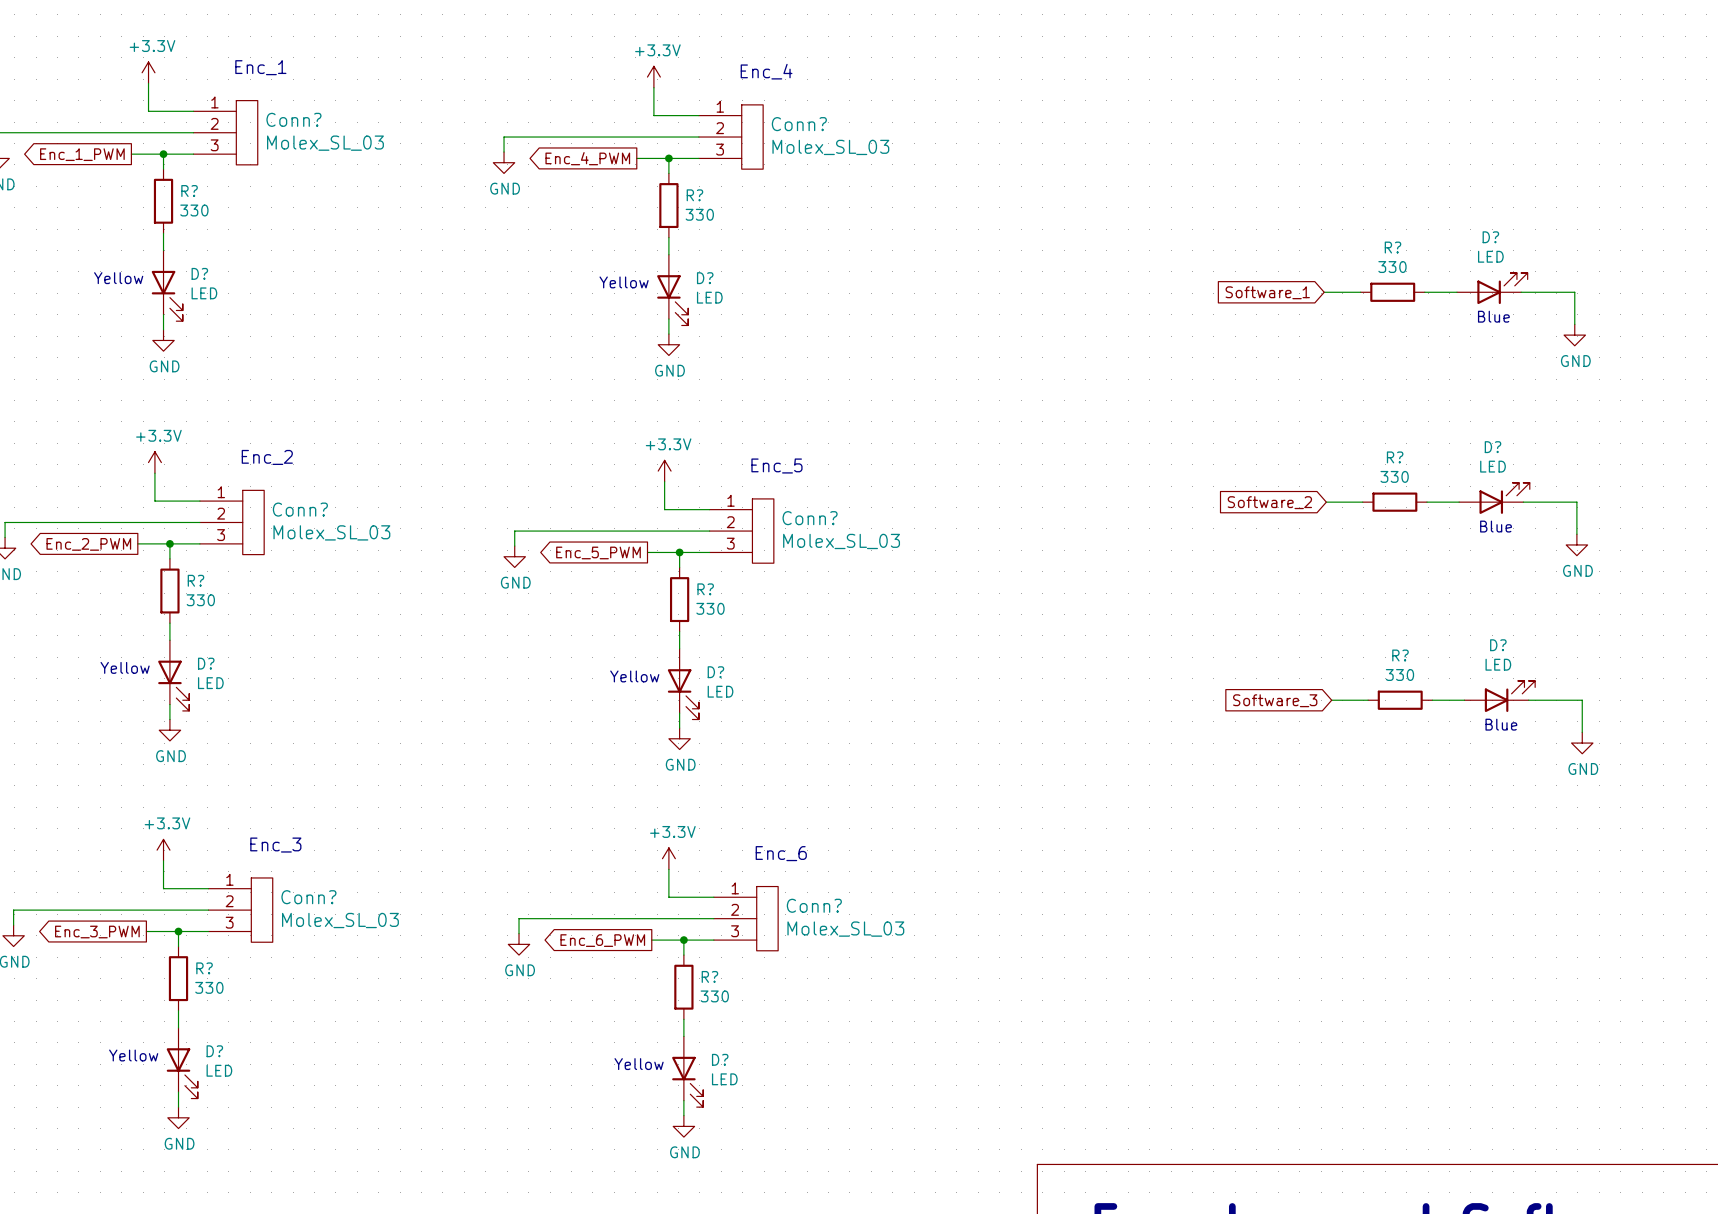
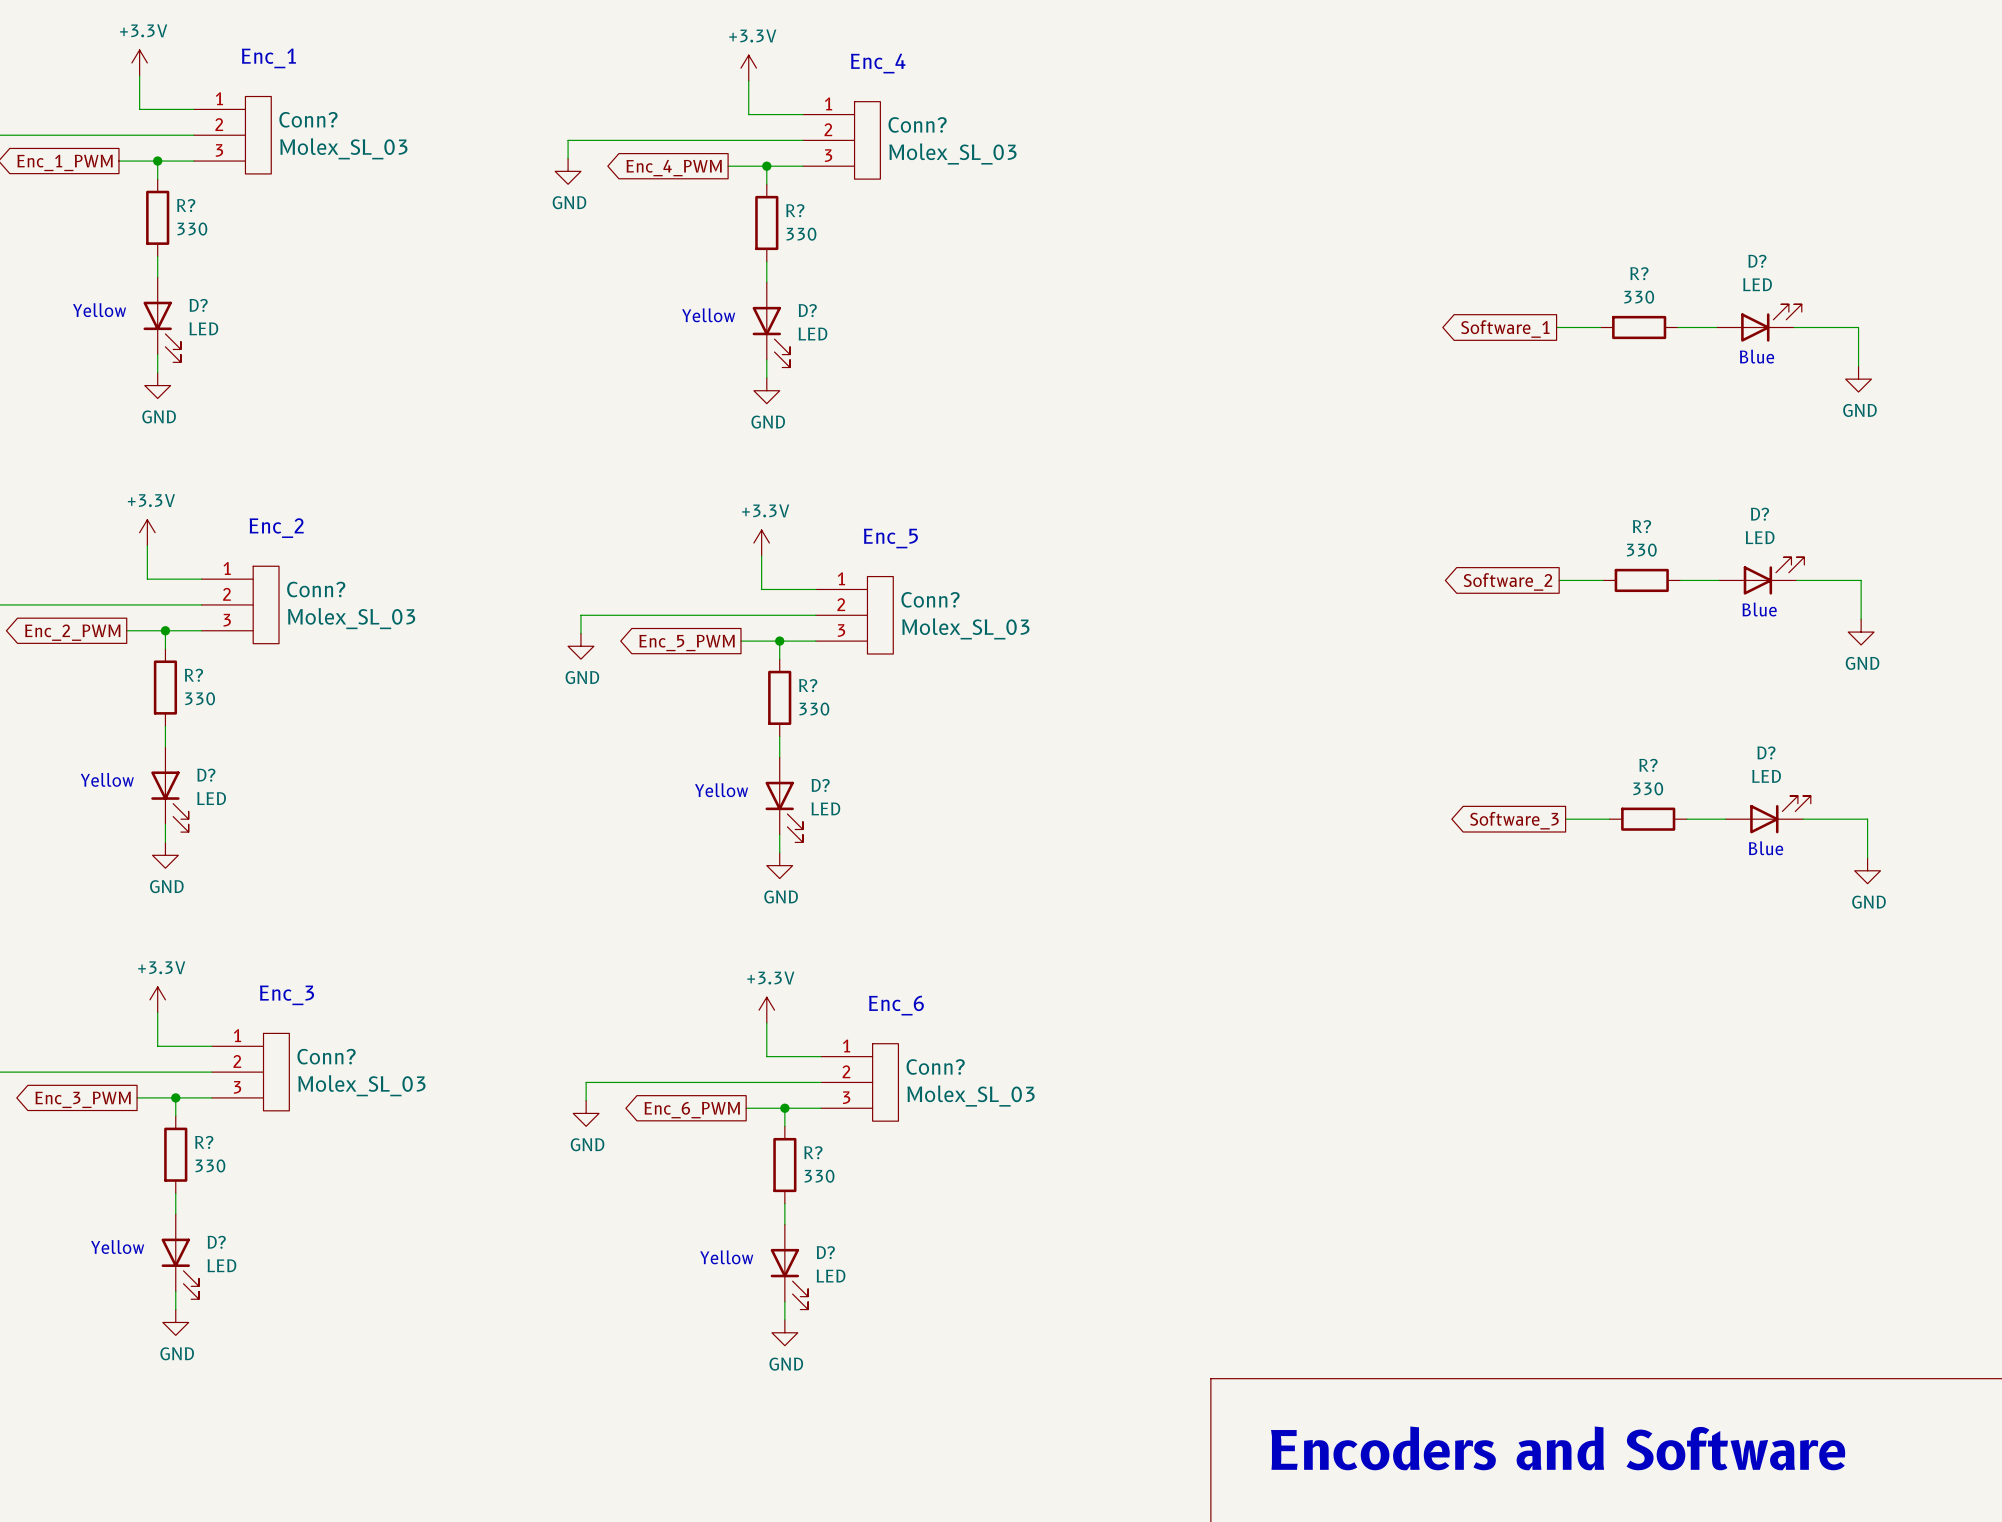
global label shape: input (1267, 292) -> output (1505, 329)
global label shape: input (1269, 502) -> output (1507, 581)
global label shape: input (1275, 700) -> output (1514, 820)

